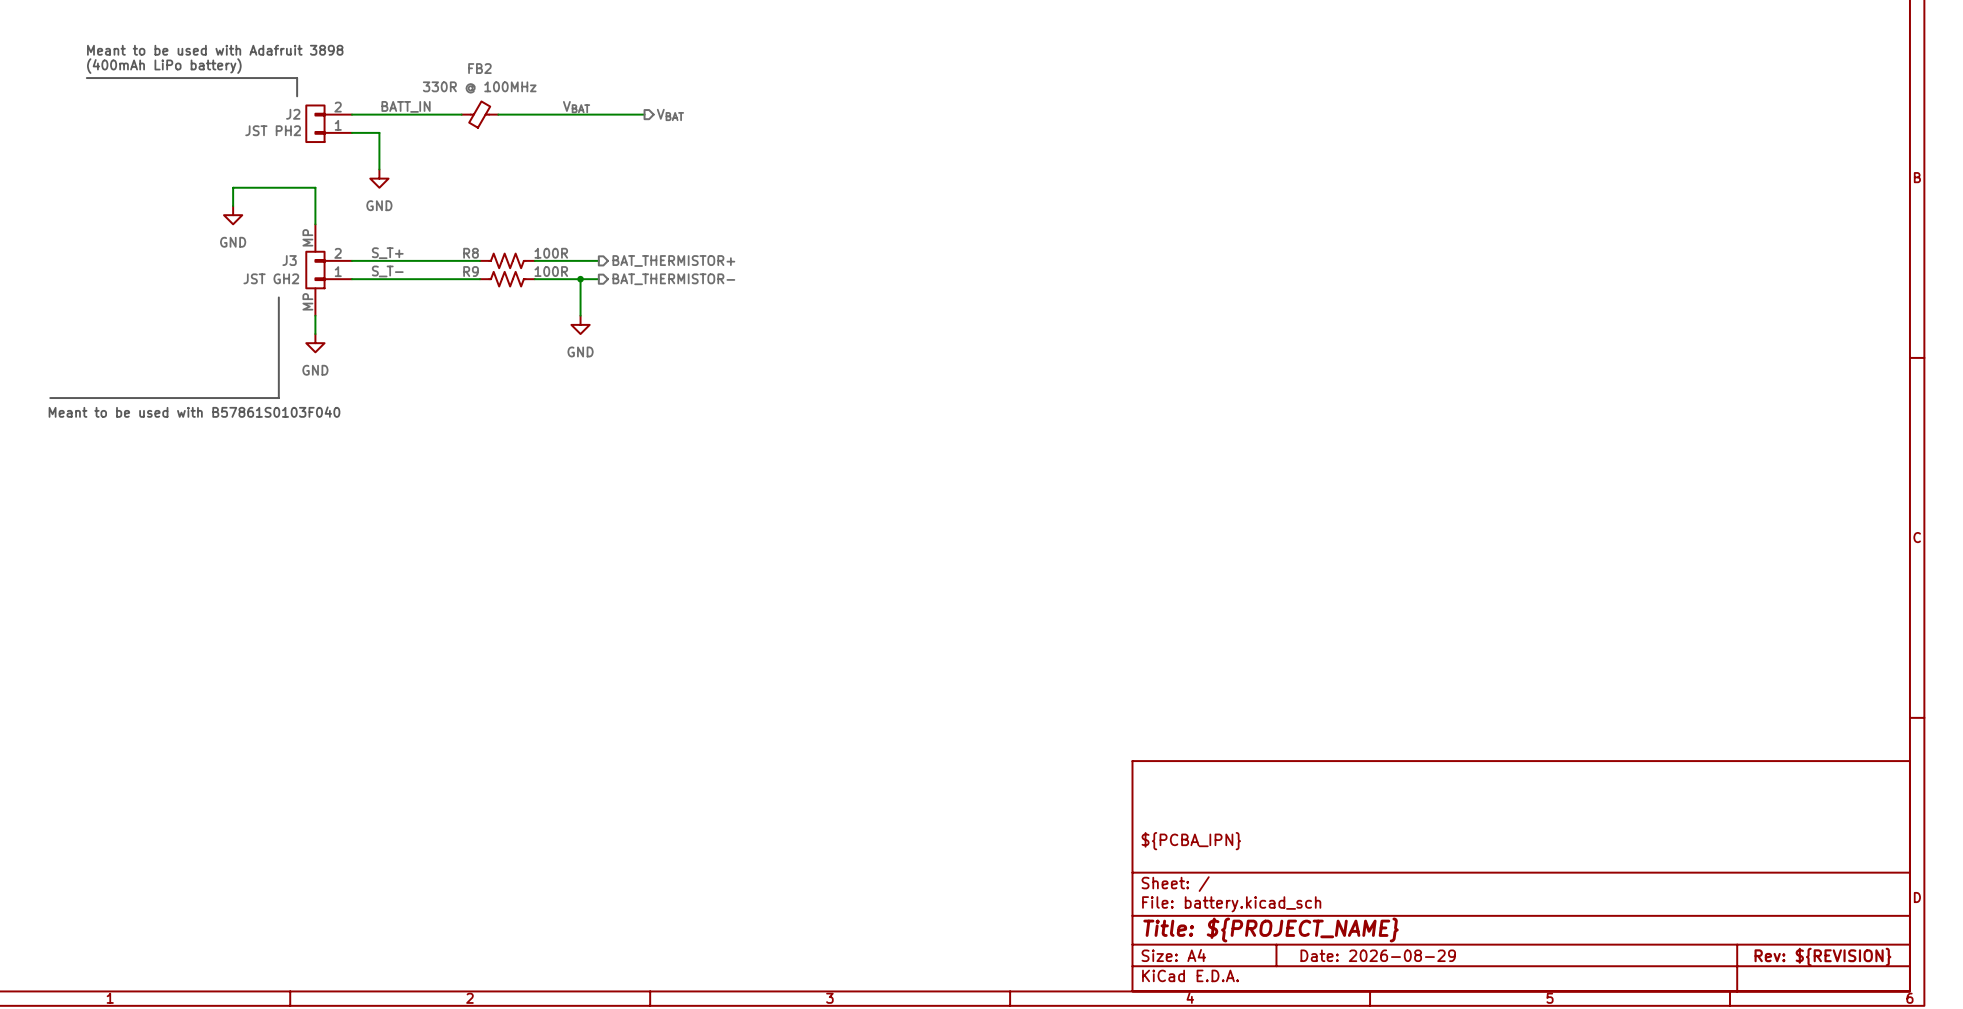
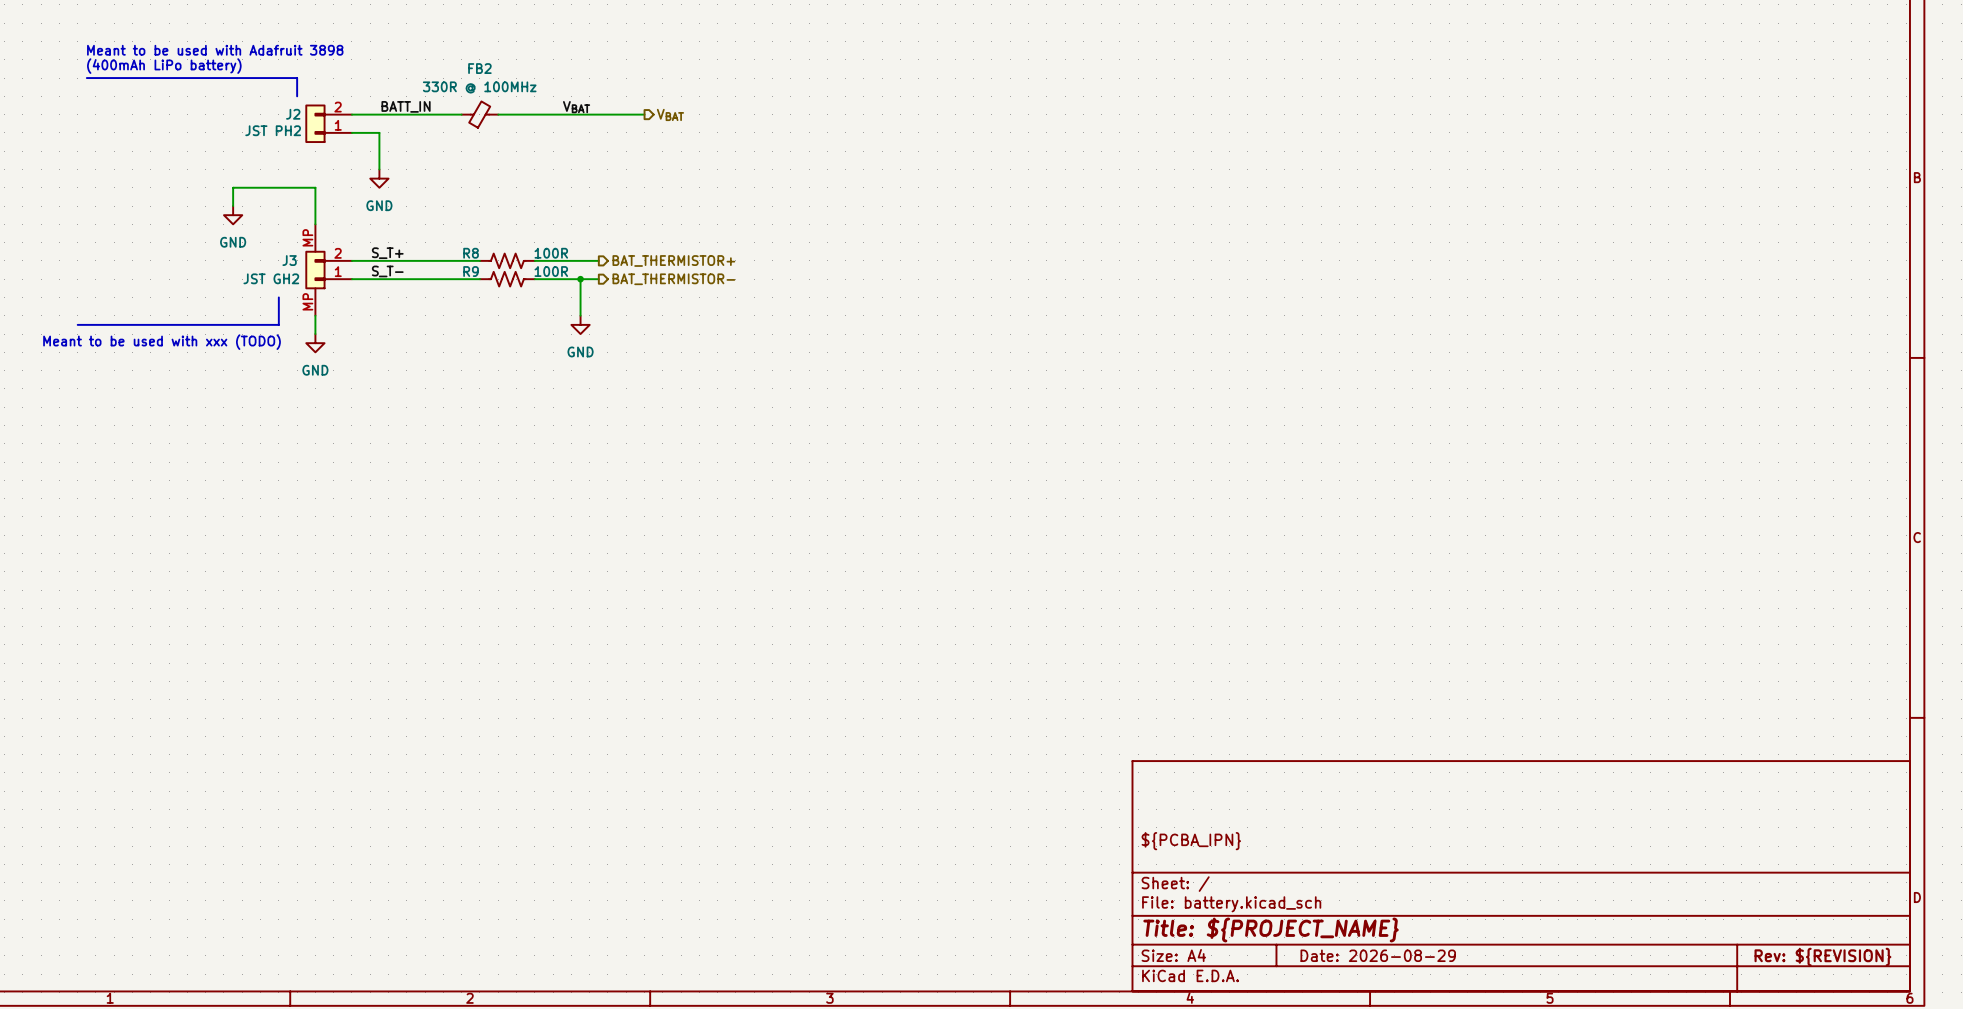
line: (278, 324) (278, 398) (50, 398) -> (278, 324) (77, 324)
text: none -> Meant to be used with xxx (TODO) (162, 342)
text: Meant to be used with B57861S0103F040 (194, 412) -> none

